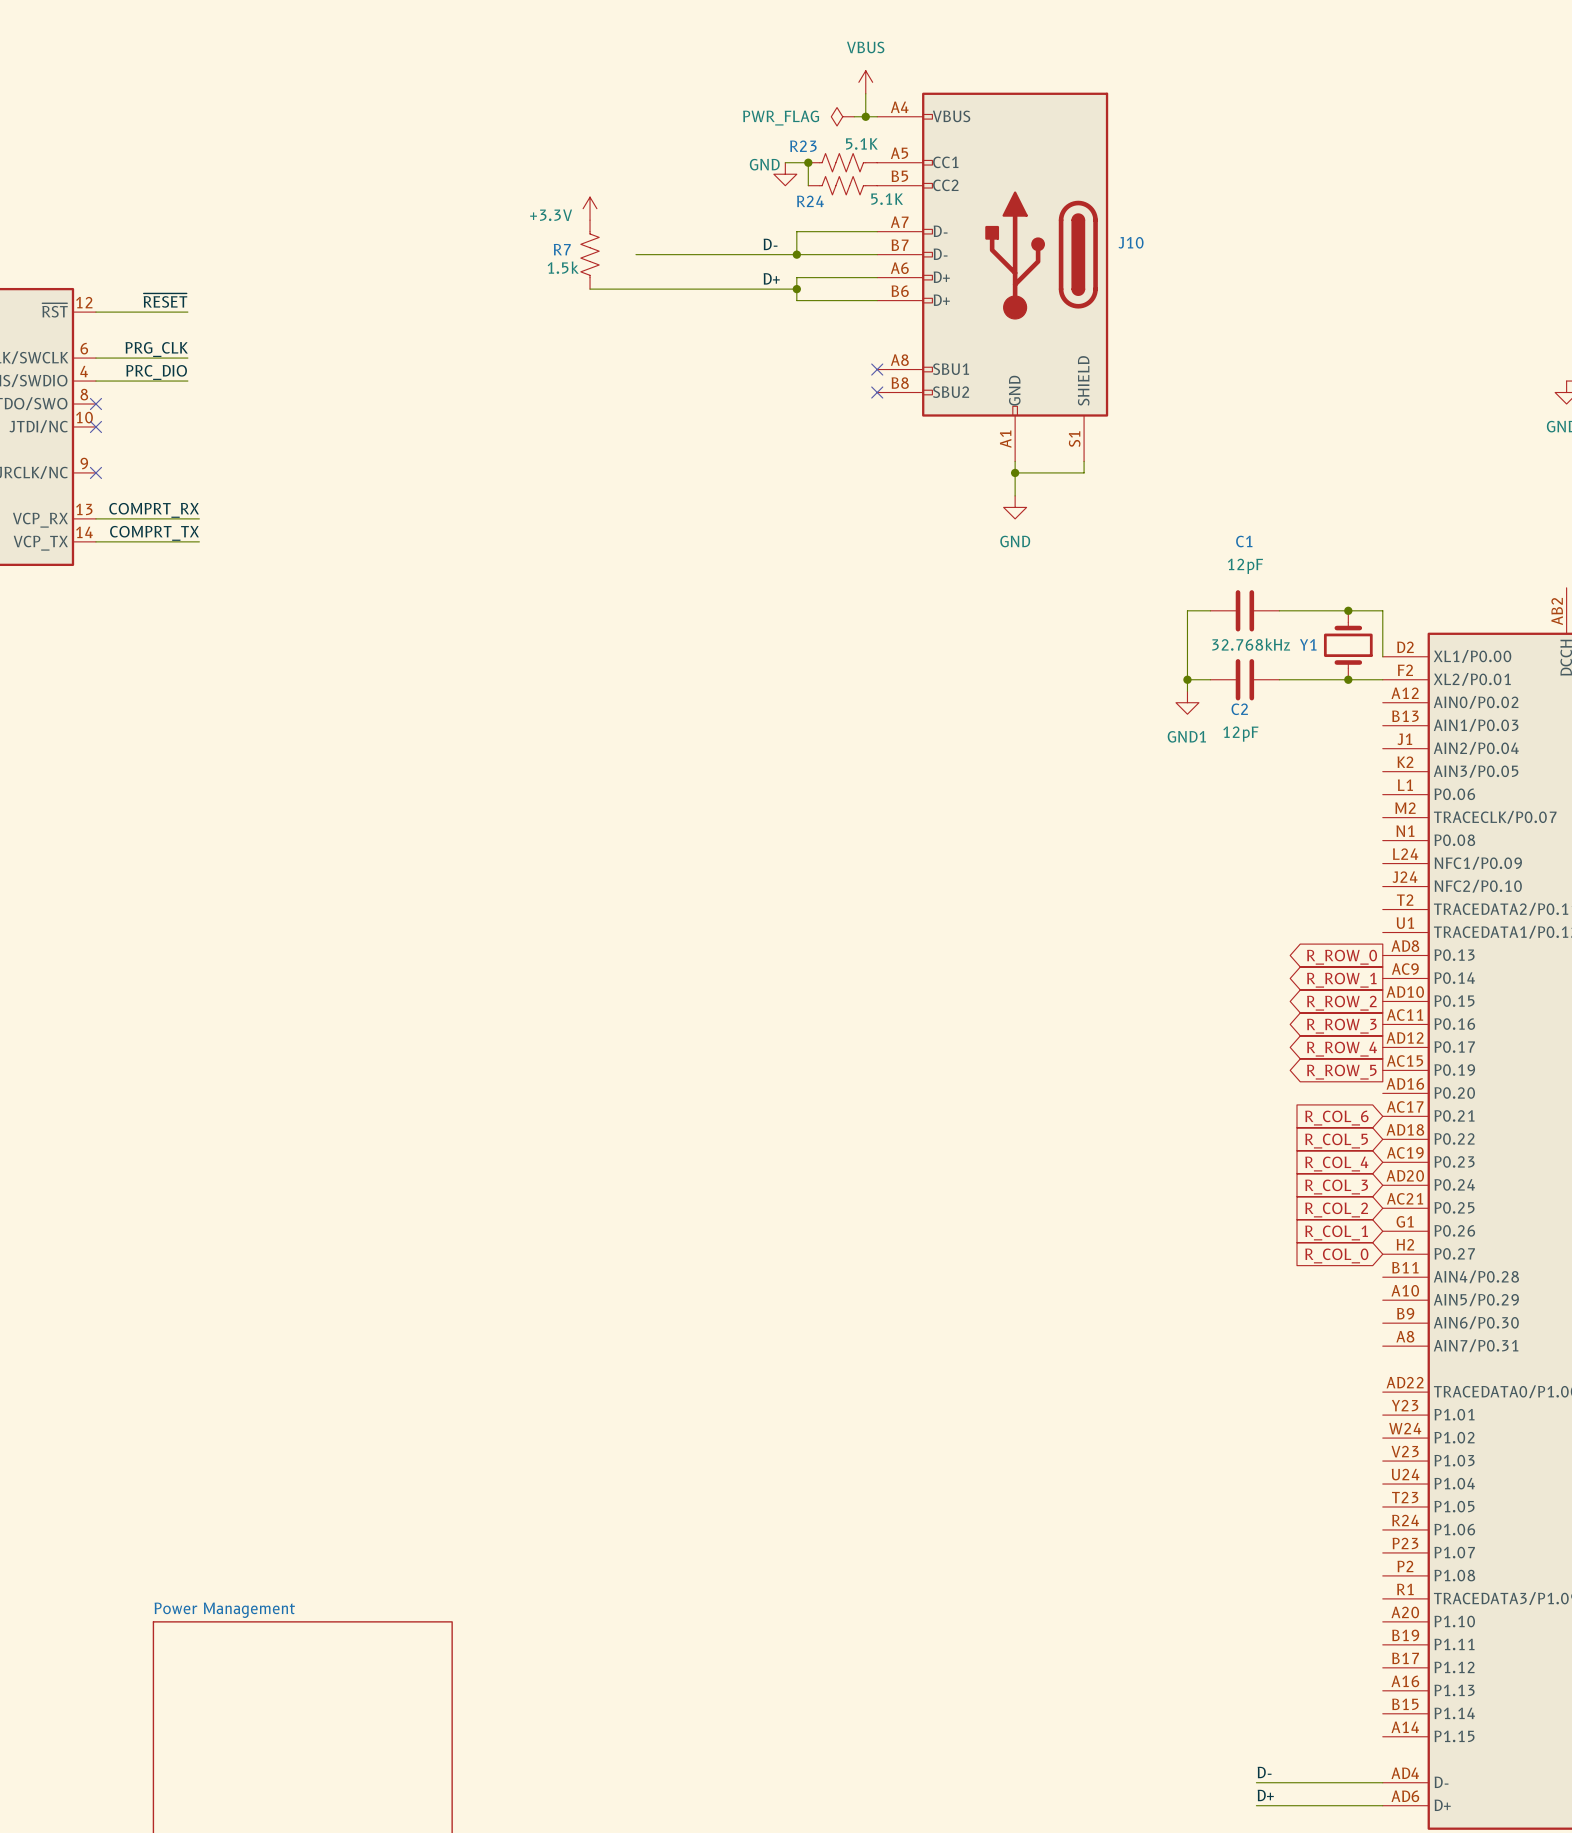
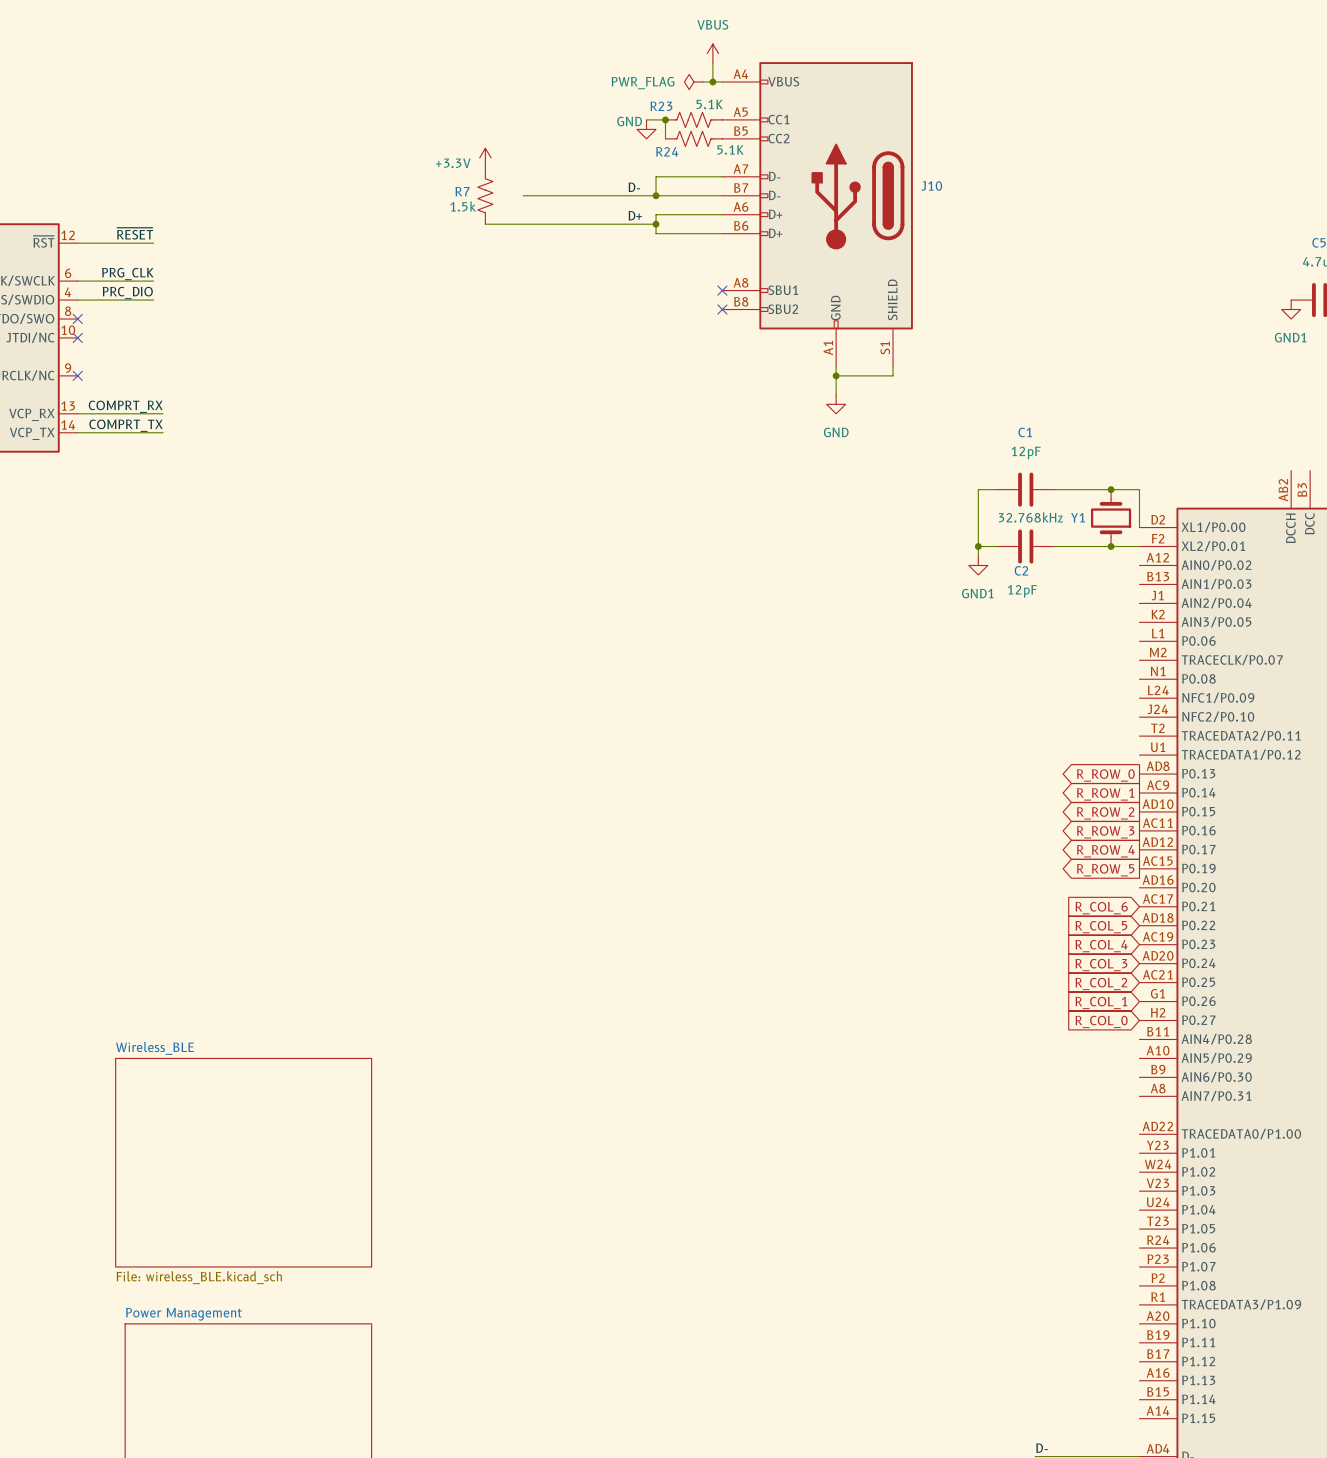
sheet Wireless_BLE: none -> File: wireless_BLE.kicad_sch (243, 1162)

